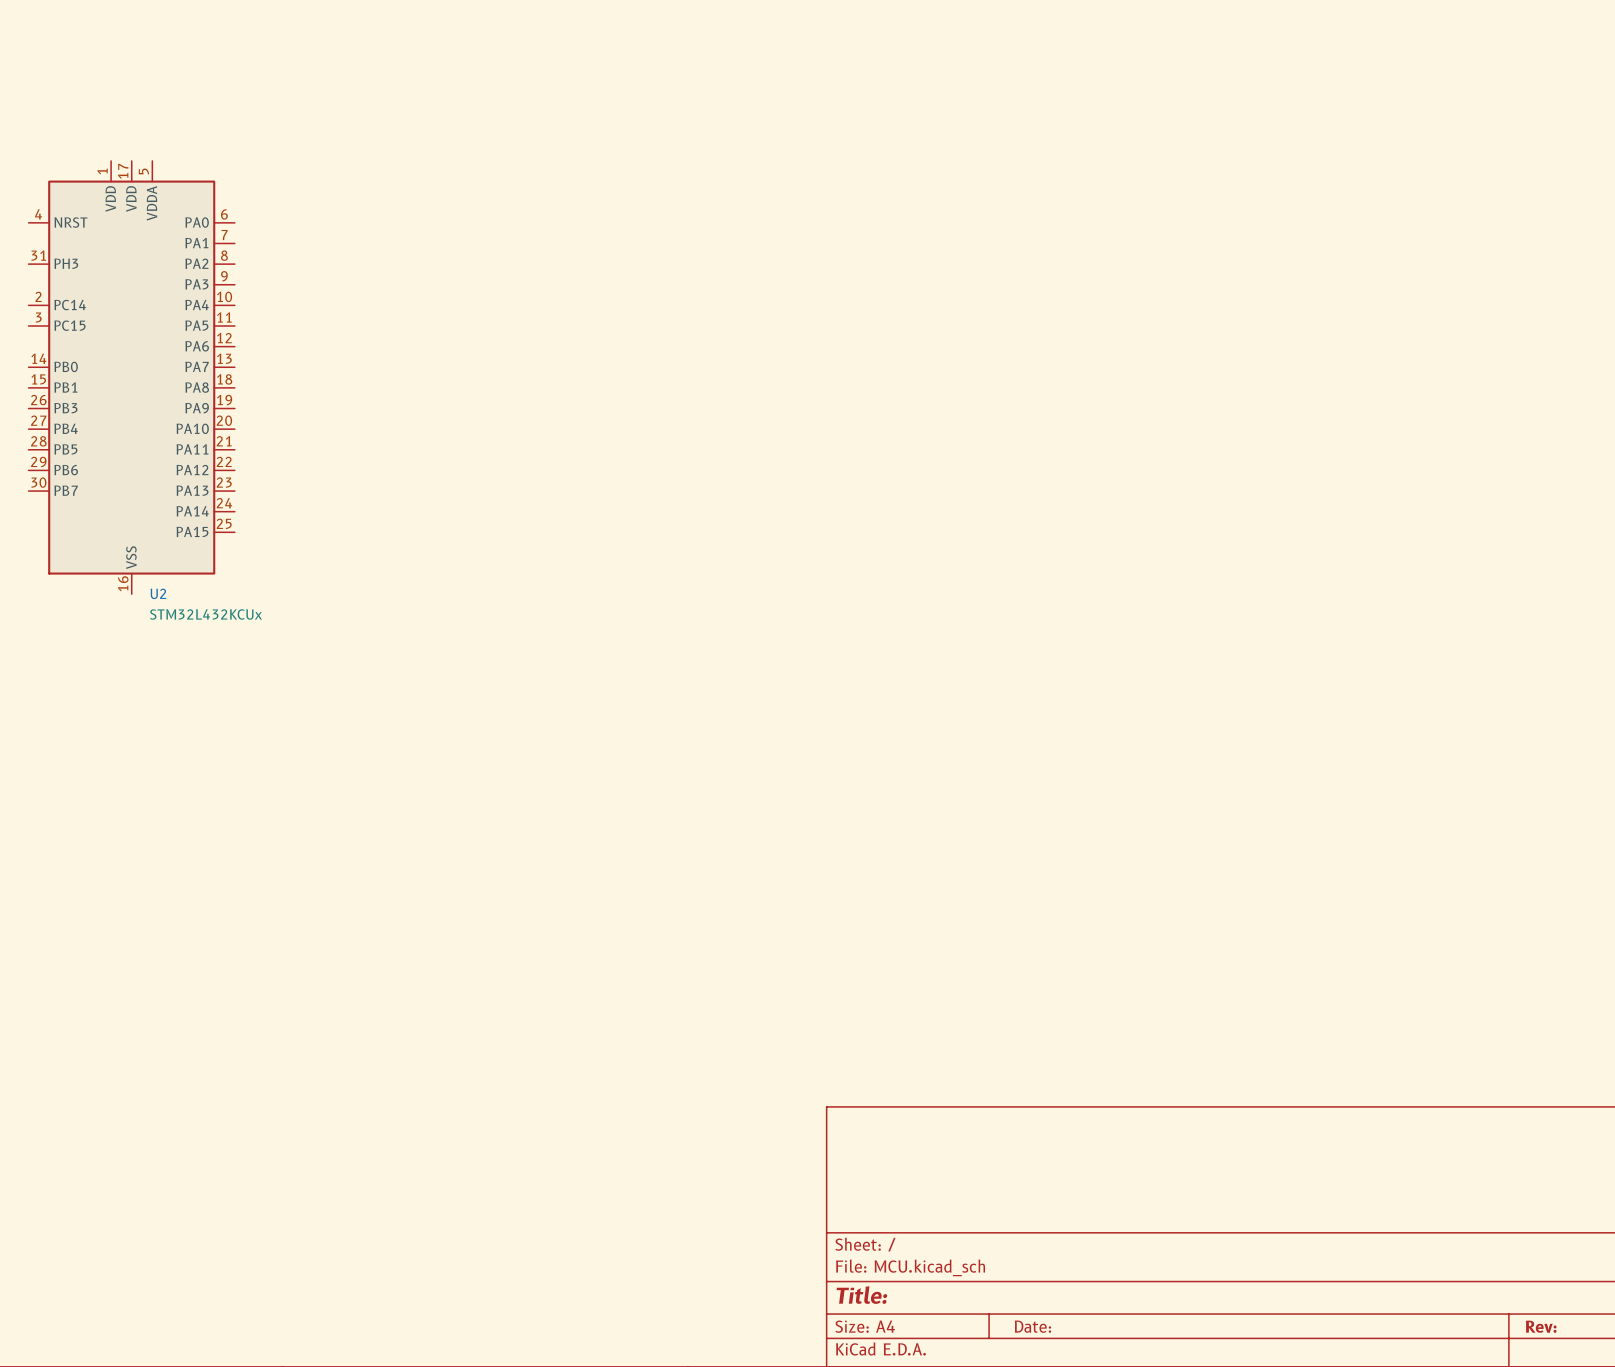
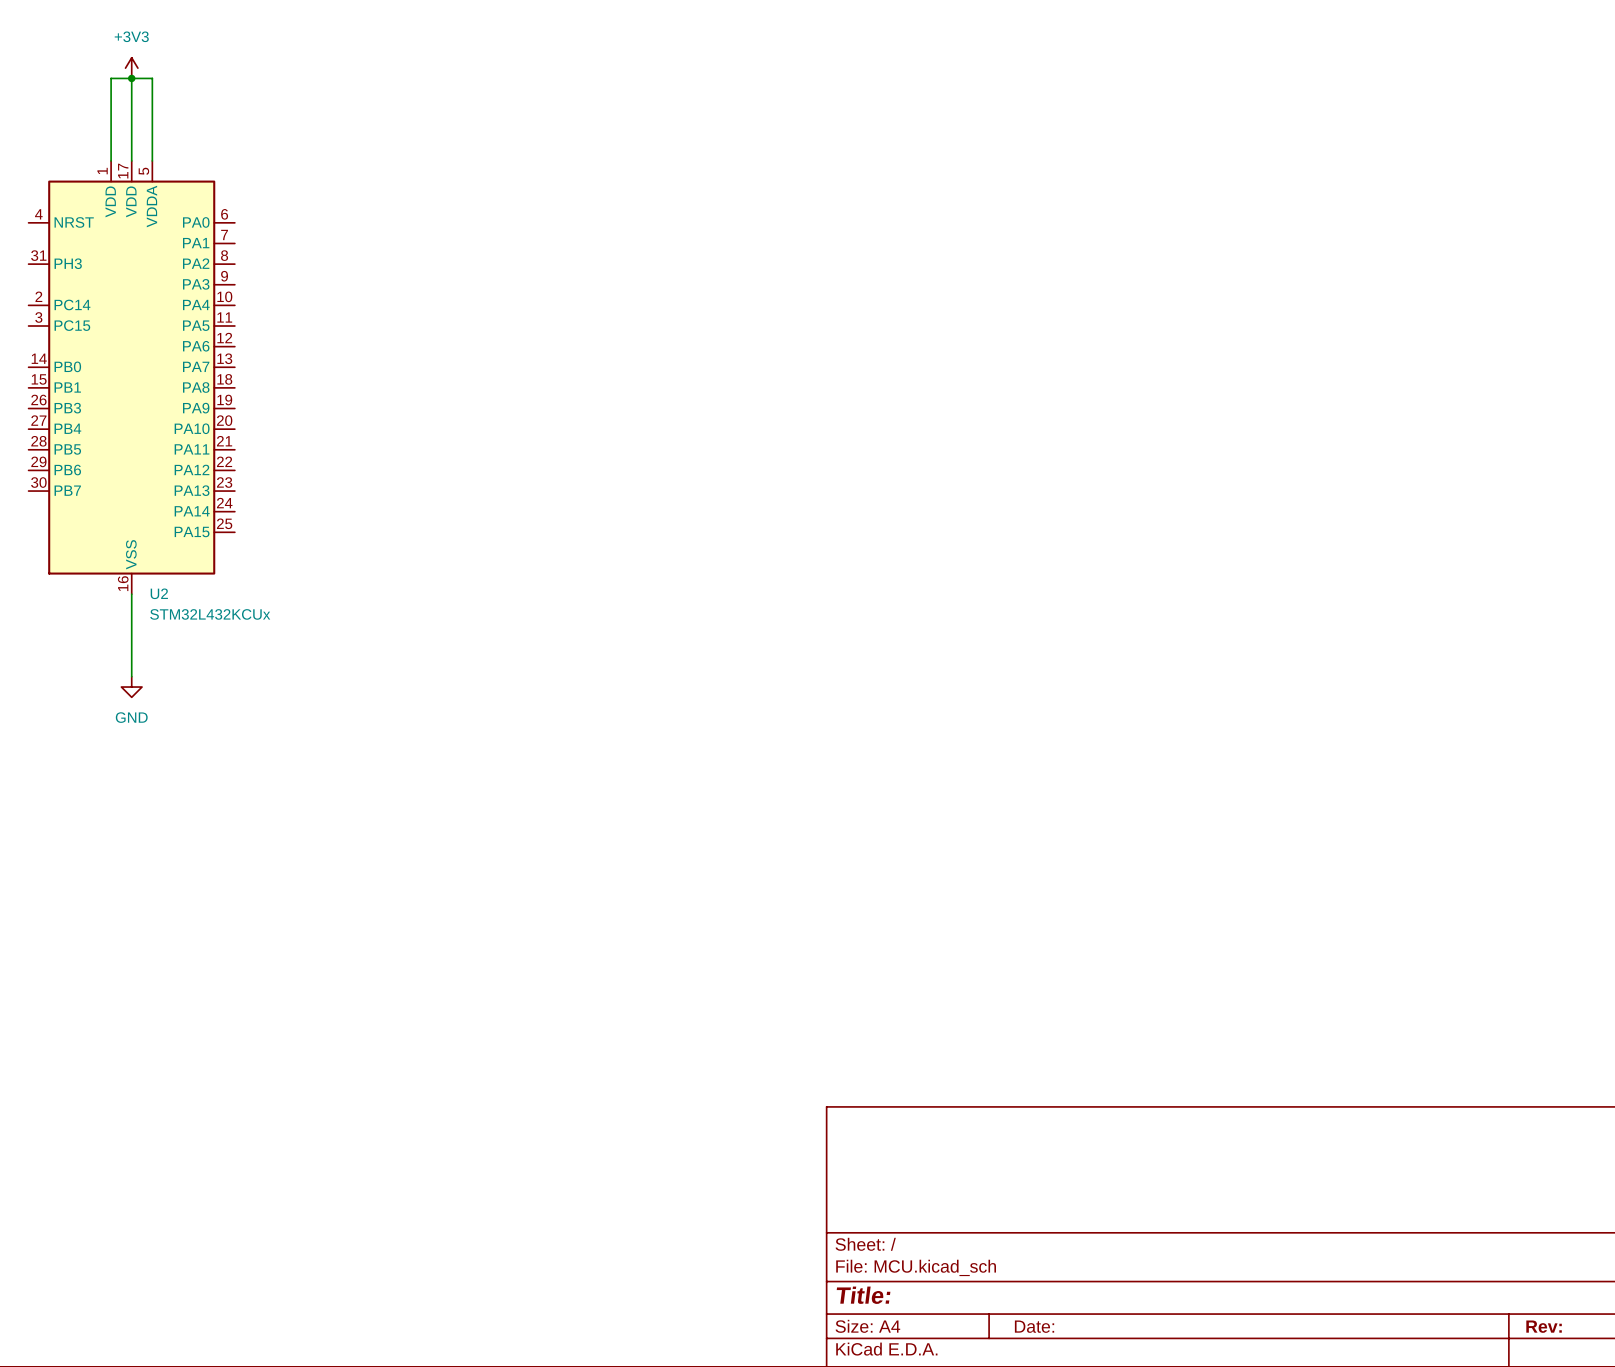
power symbol: none -> +3V3 (131, 68)
wire: none -> (131, 78) (131, 160)
junction: none -> (131, 78)
wire: none -> (111, 160) (111, 78) (152, 78) (152, 160)
wire: none -> (131, 594) (131, 676)
power symbol: none -> GND (131, 687)

